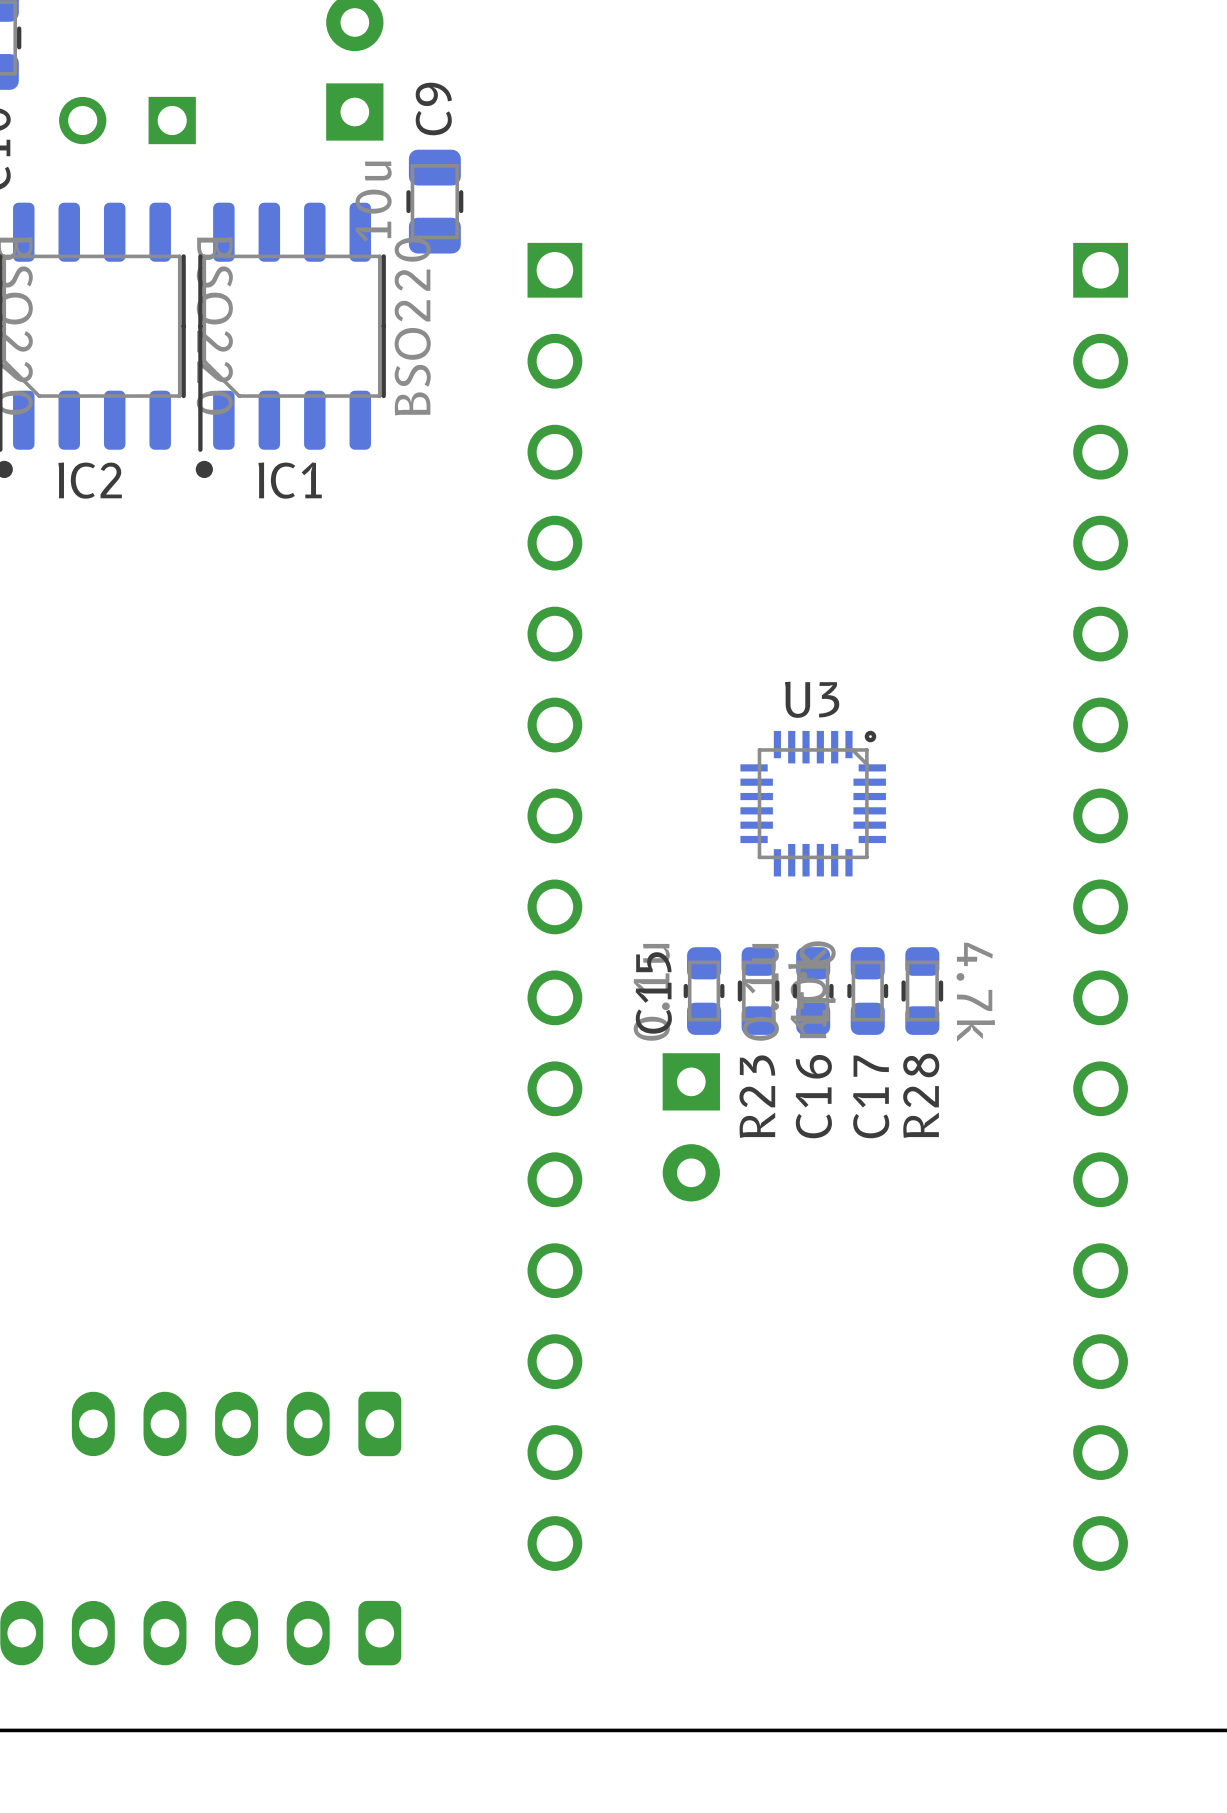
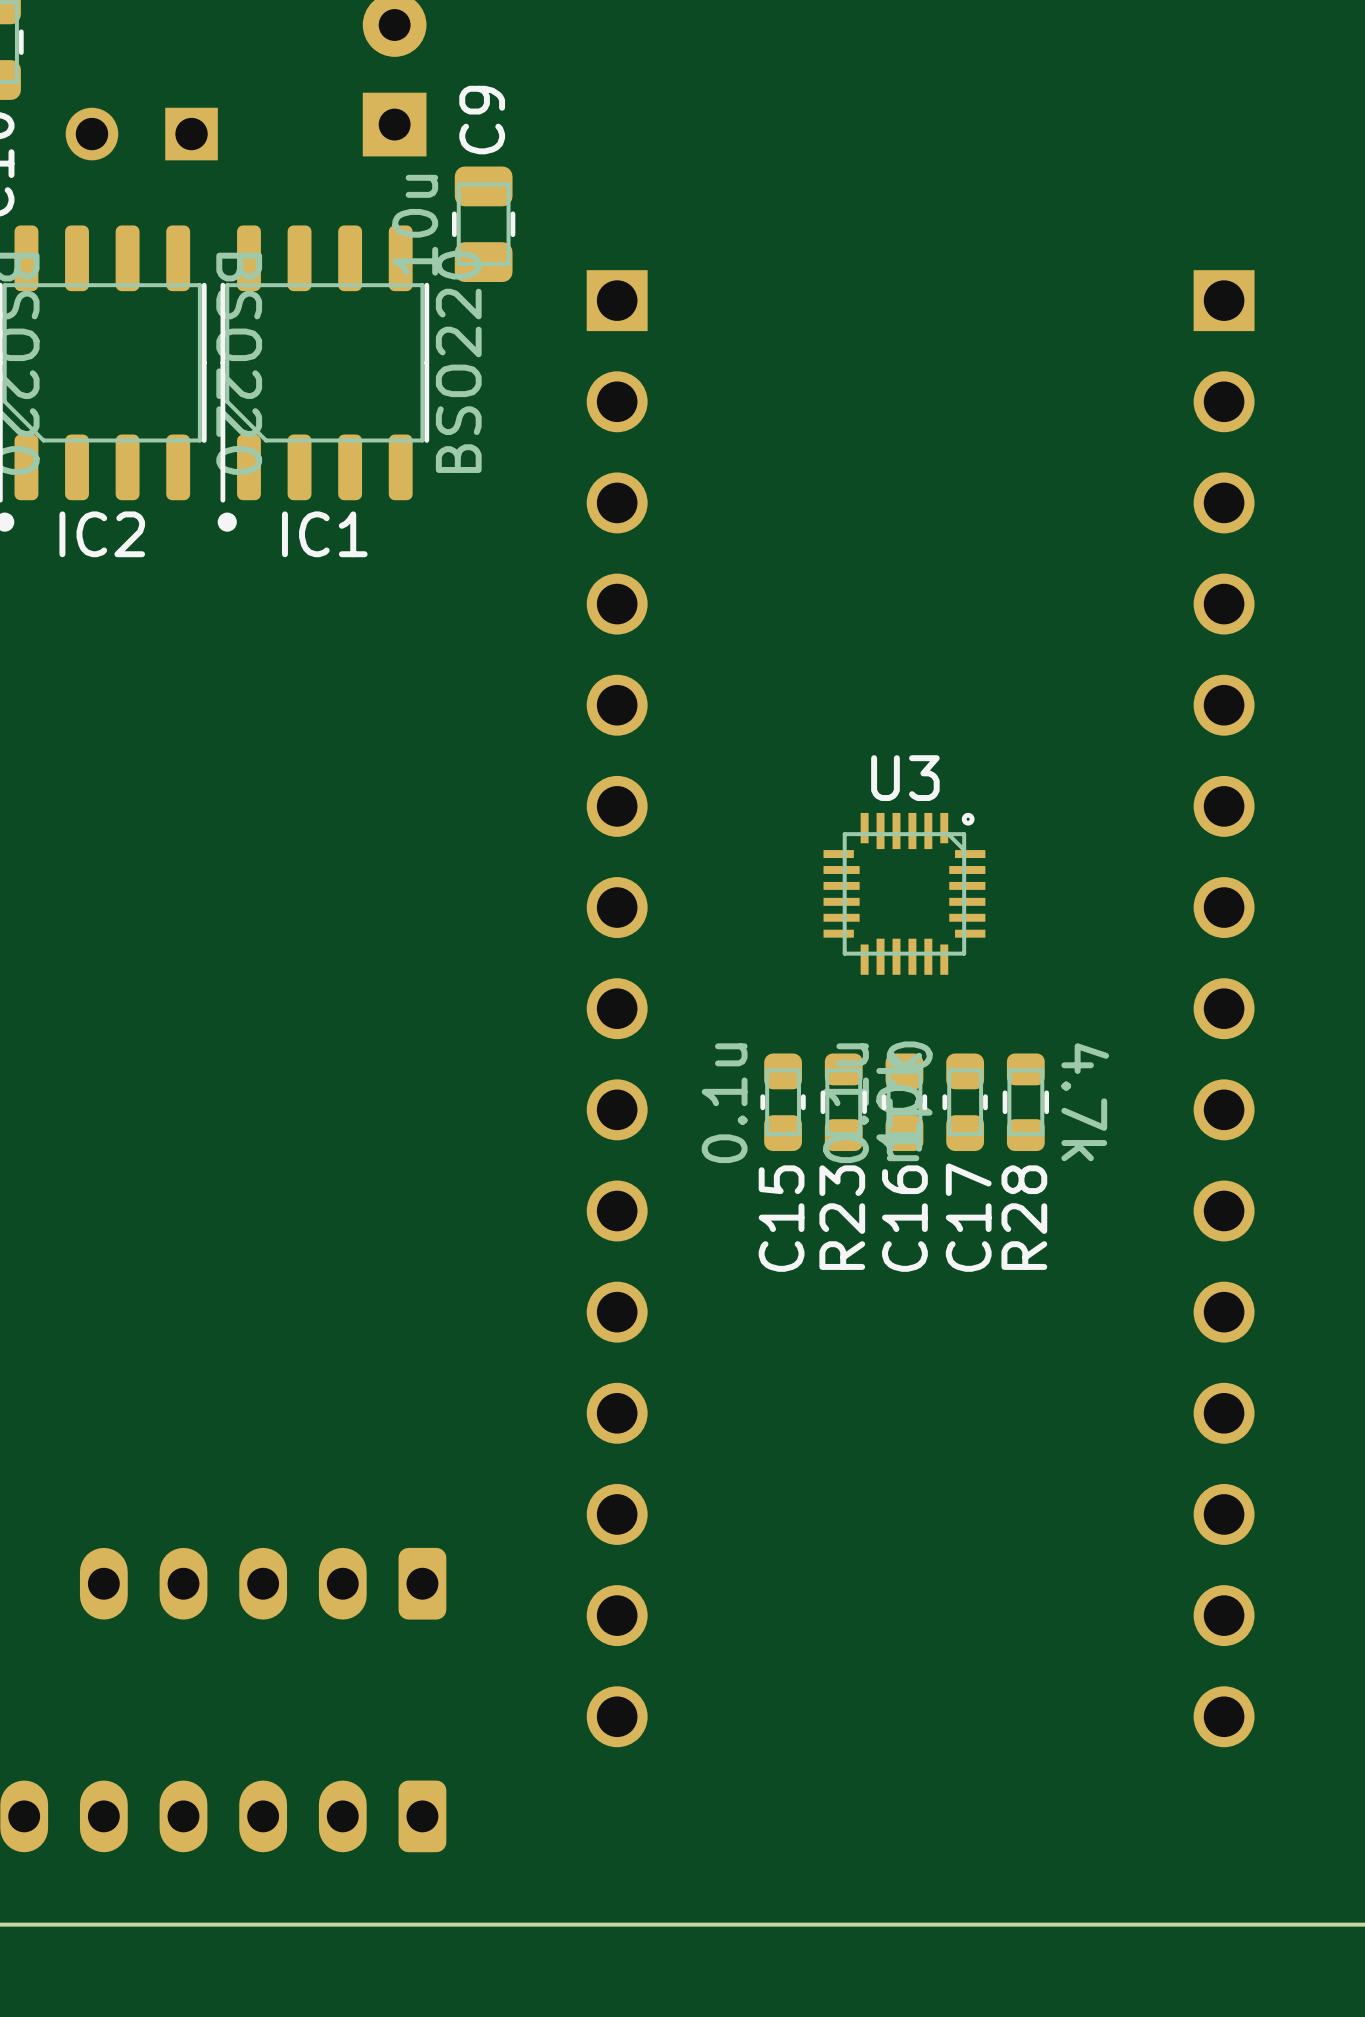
C15 name position: C15 (653, 992) -> C15 (781, 1218)
part: (691, 1127) -> none

